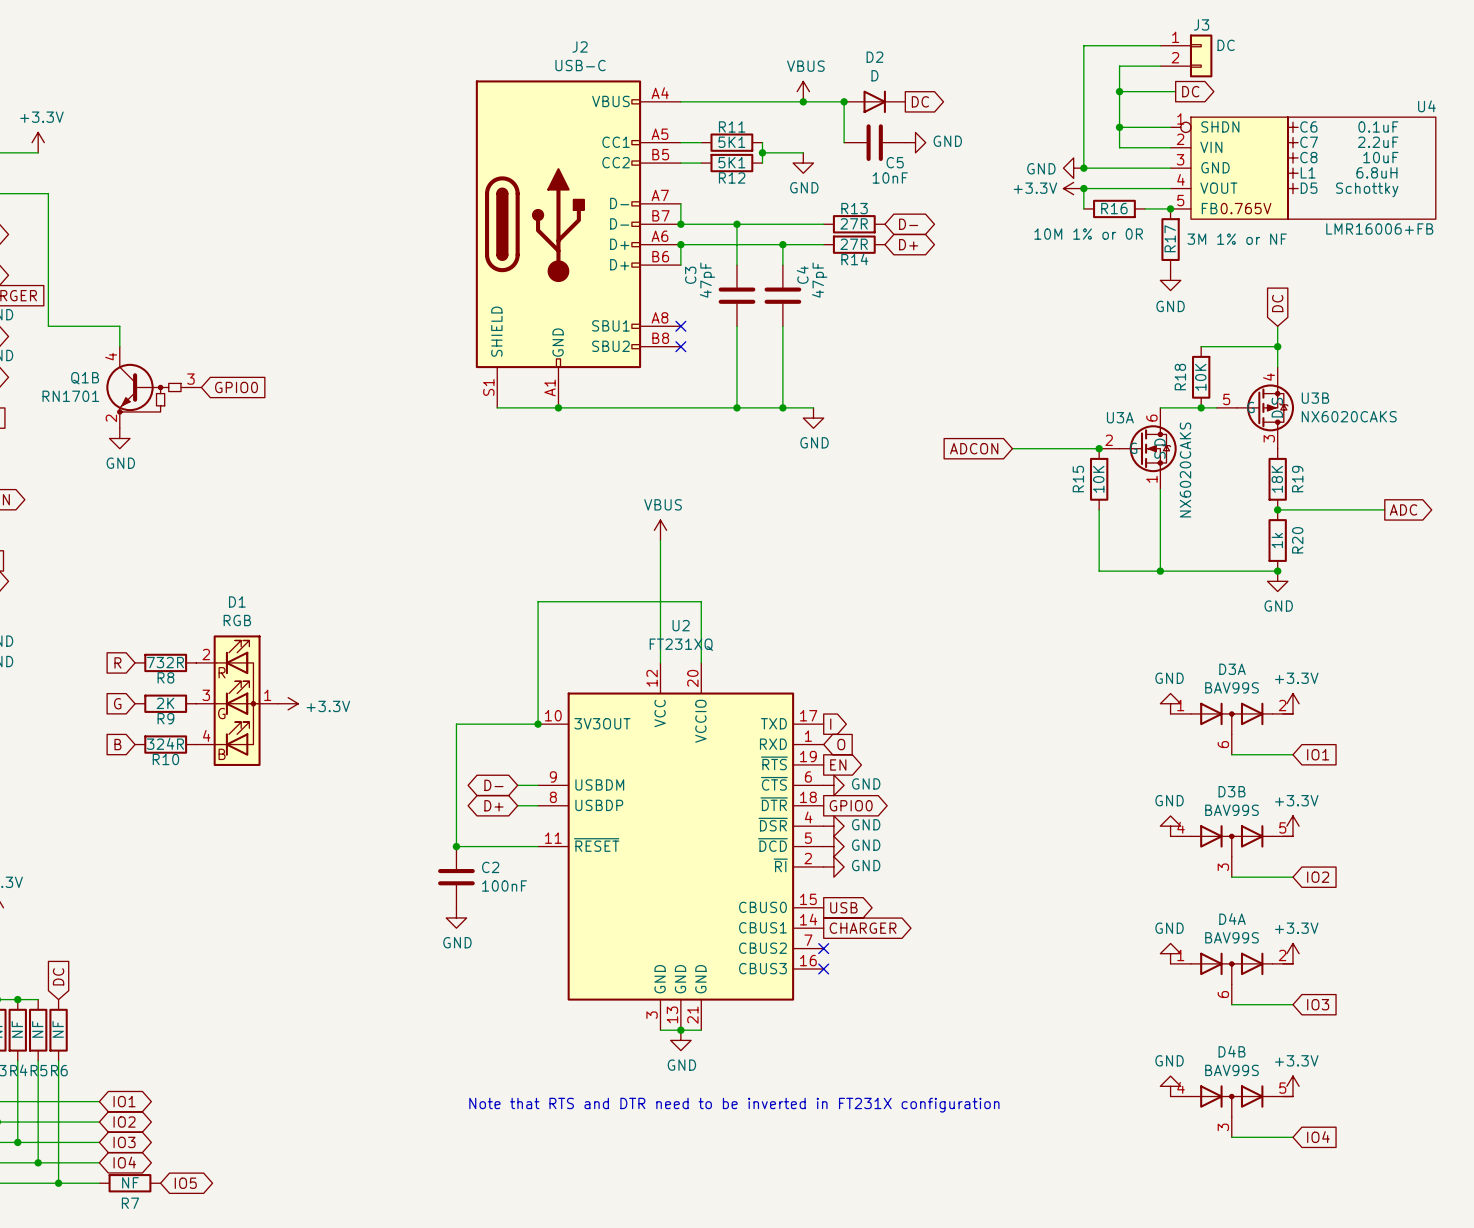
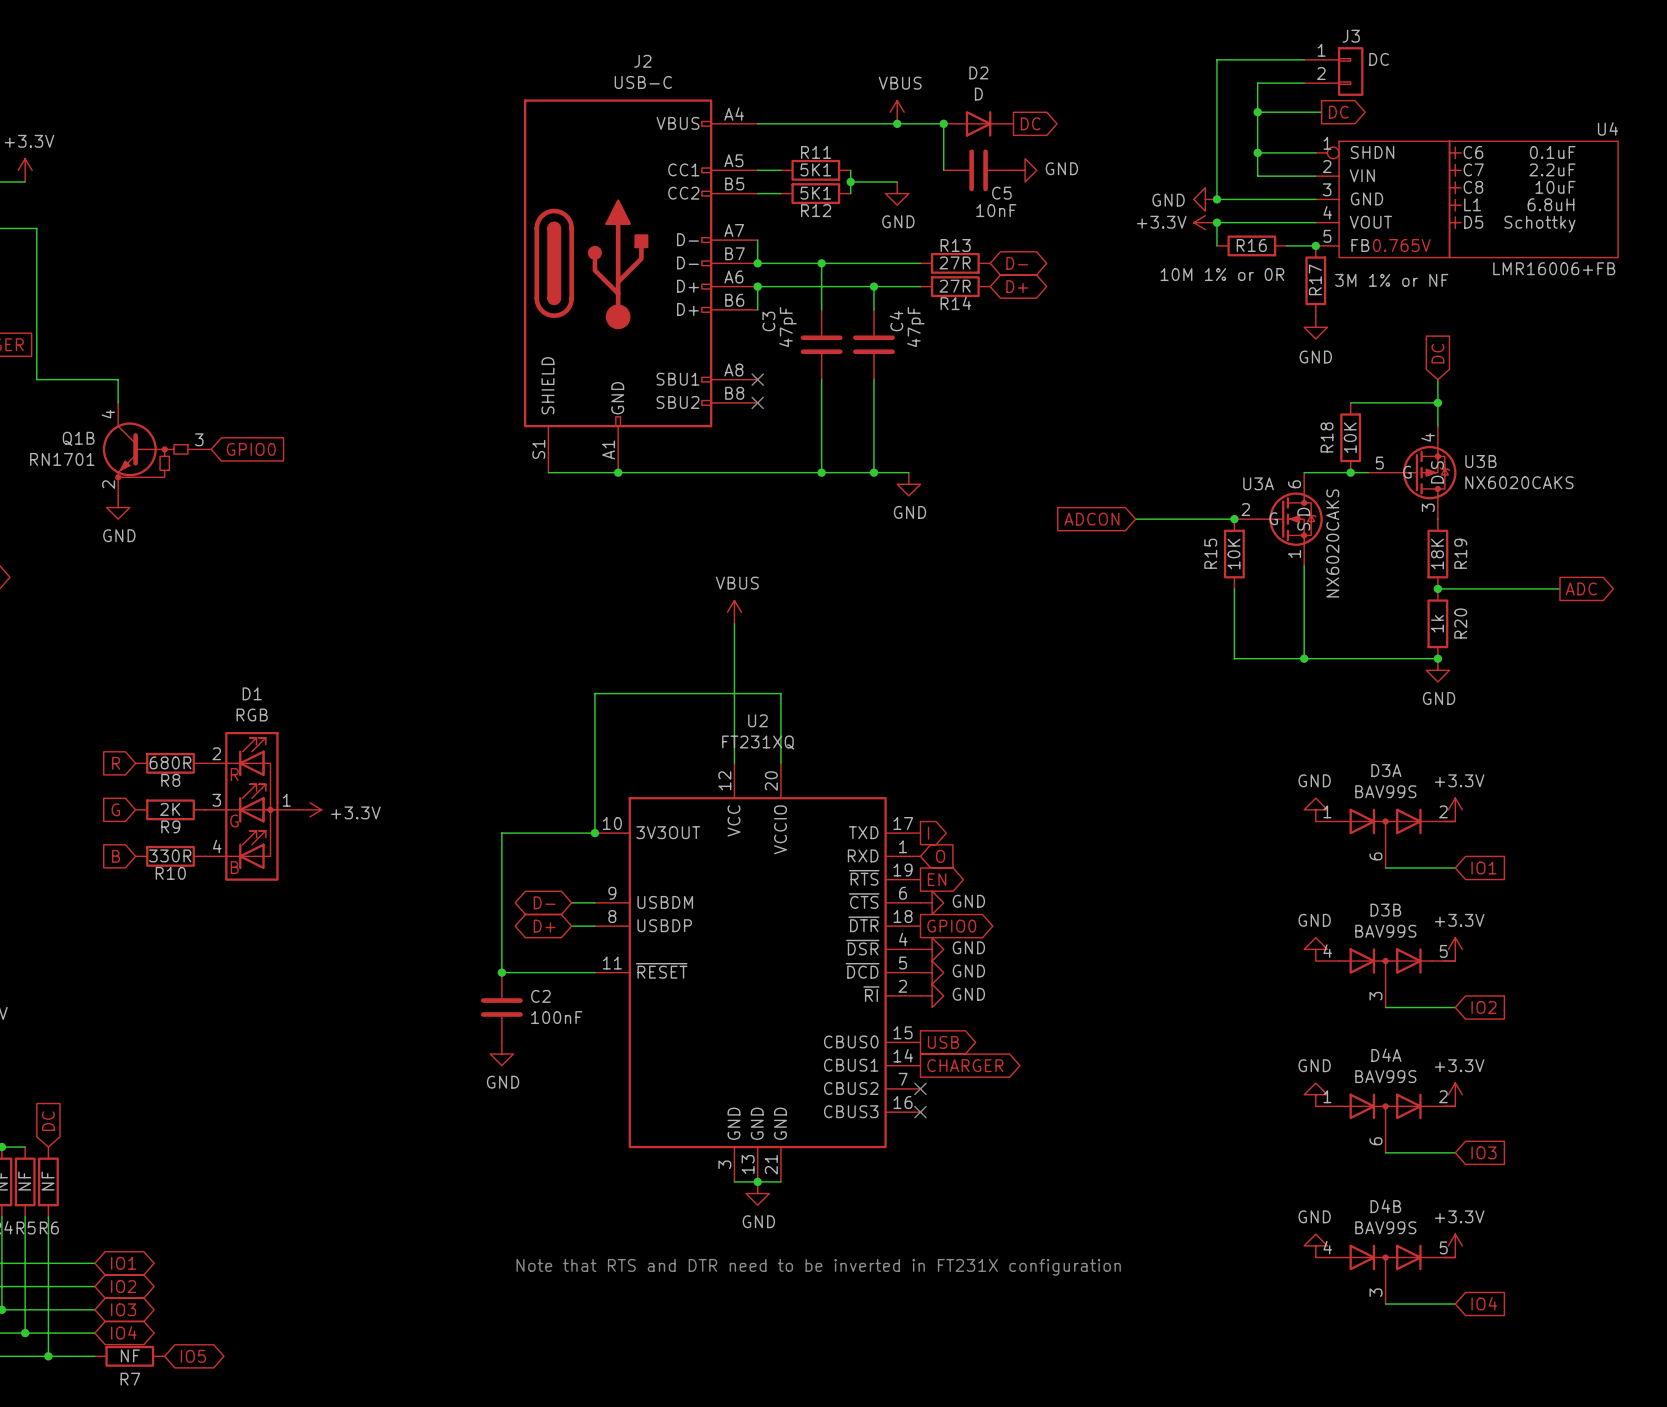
R8 value: 732R (165, 662) -> 680R (170, 762)
R10 value: 324R (165, 743) -> 330R (170, 855)

